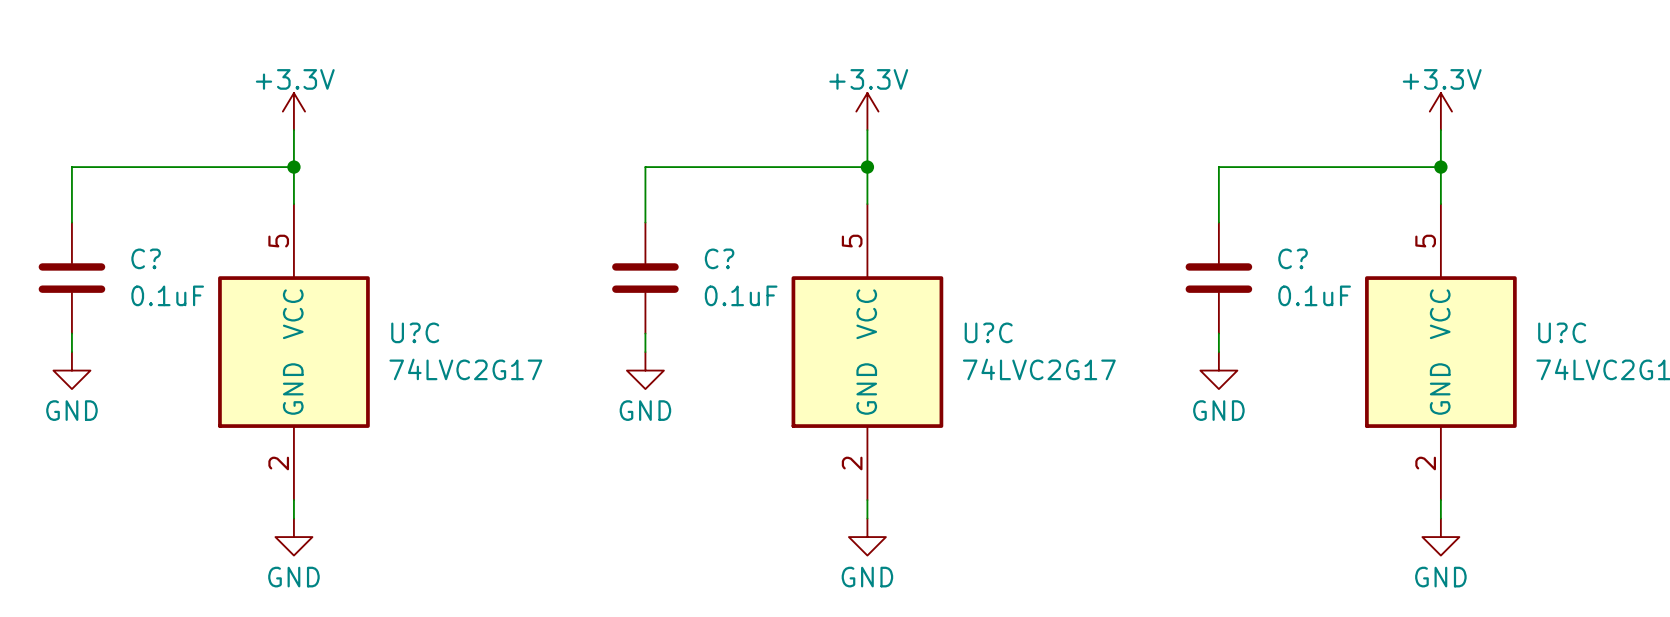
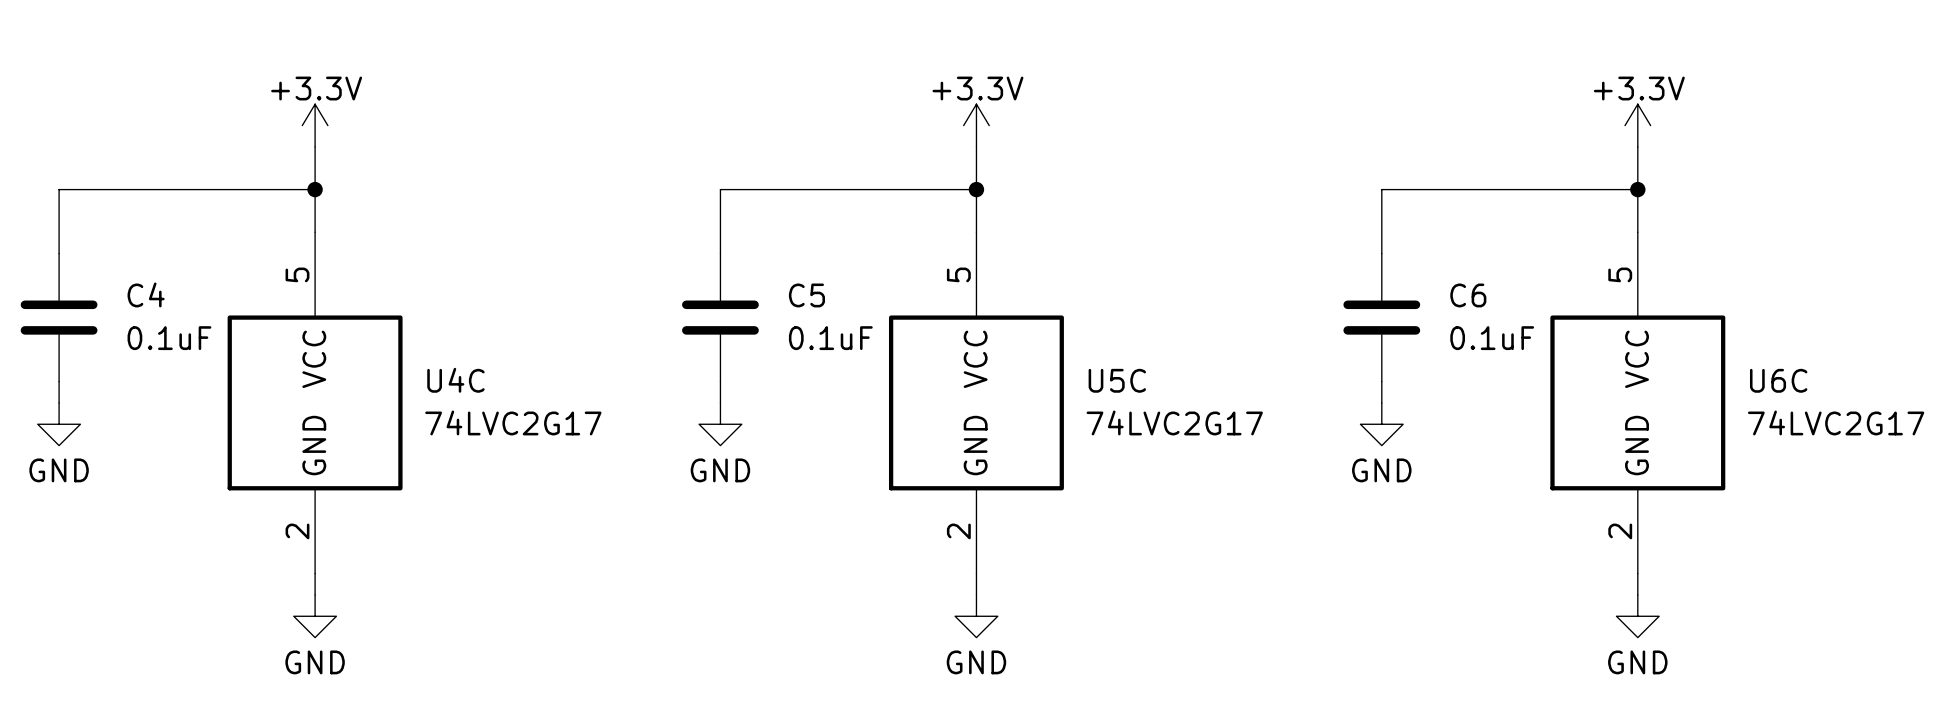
C? name: C? (146, 258) -> C4 (146, 294)
C? name: C? (719, 258) -> C5 (806, 295)
C? name: C? (1293, 258) -> C6 (1468, 295)
U?C name: U?C (415, 332) -> U4C (455, 380)
U?C name: U?C (988, 332) -> U5C (1117, 380)
U?C name: U?C (1562, 332) -> U6C (1778, 380)

